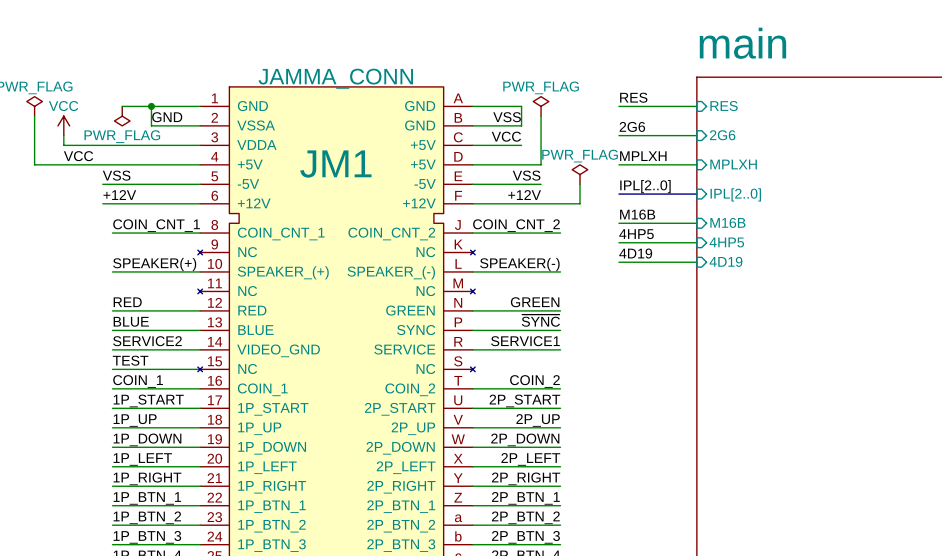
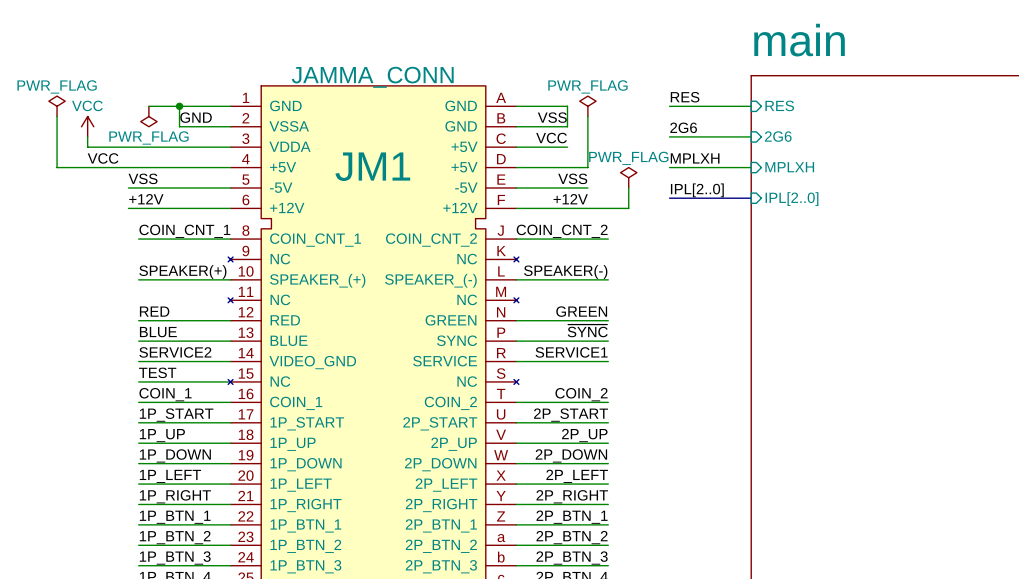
label: M16B (637, 214) -> none
sheet pin: M16B (727, 222) -> none
wire: (618, 223) (696, 223) -> none
label: 4HP5 (636, 234) -> none
wire: (618, 242) (696, 242) -> none
sheet pin: 4HP5 (726, 242) -> none
label: 4D19 (635, 253) -> none
sheet pin: 4D19 (725, 261) -> none
wire: (618, 262) (696, 262) -> none

